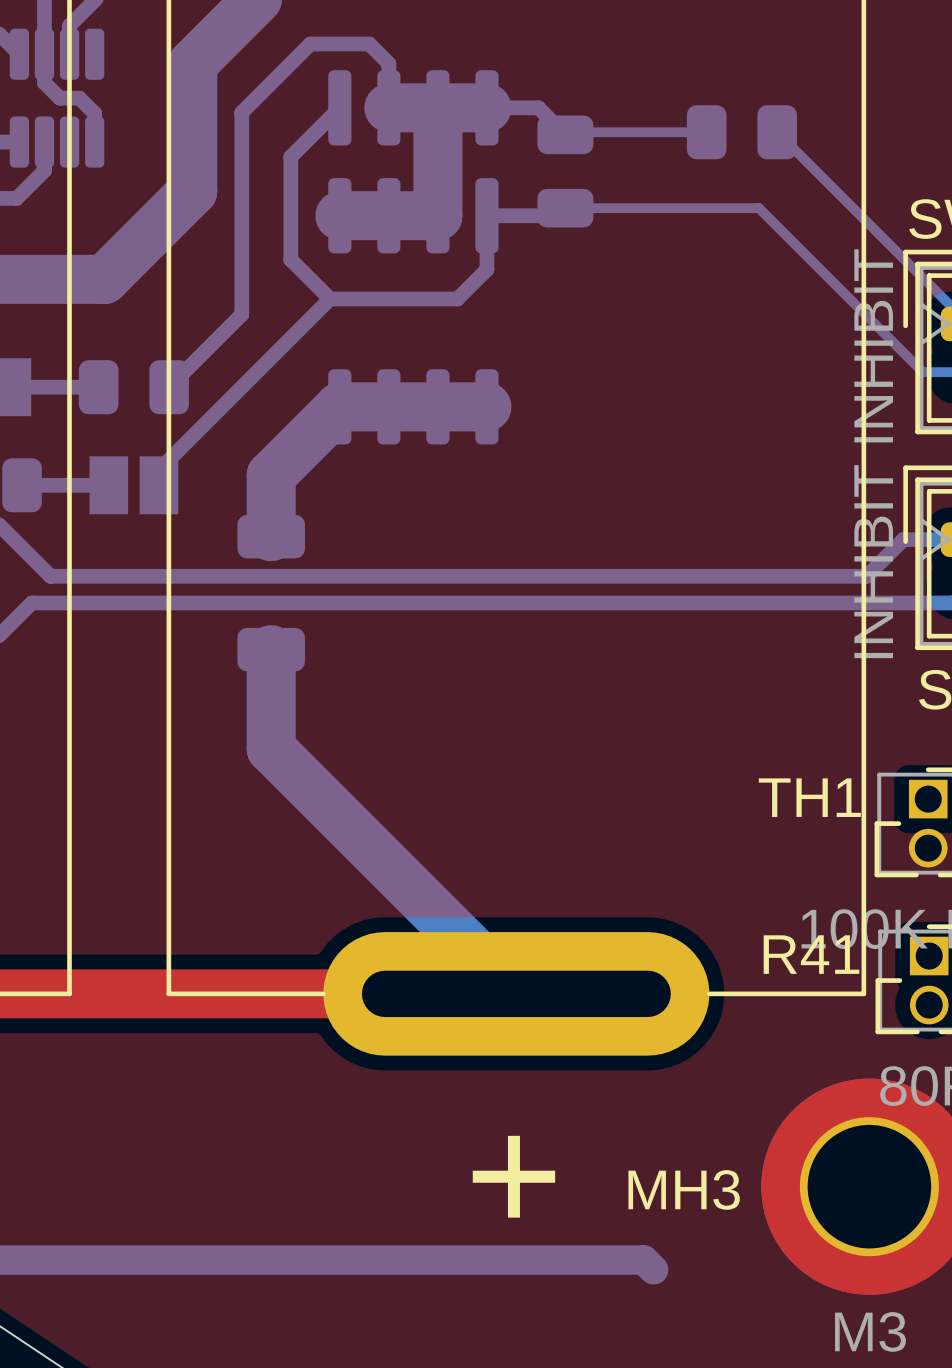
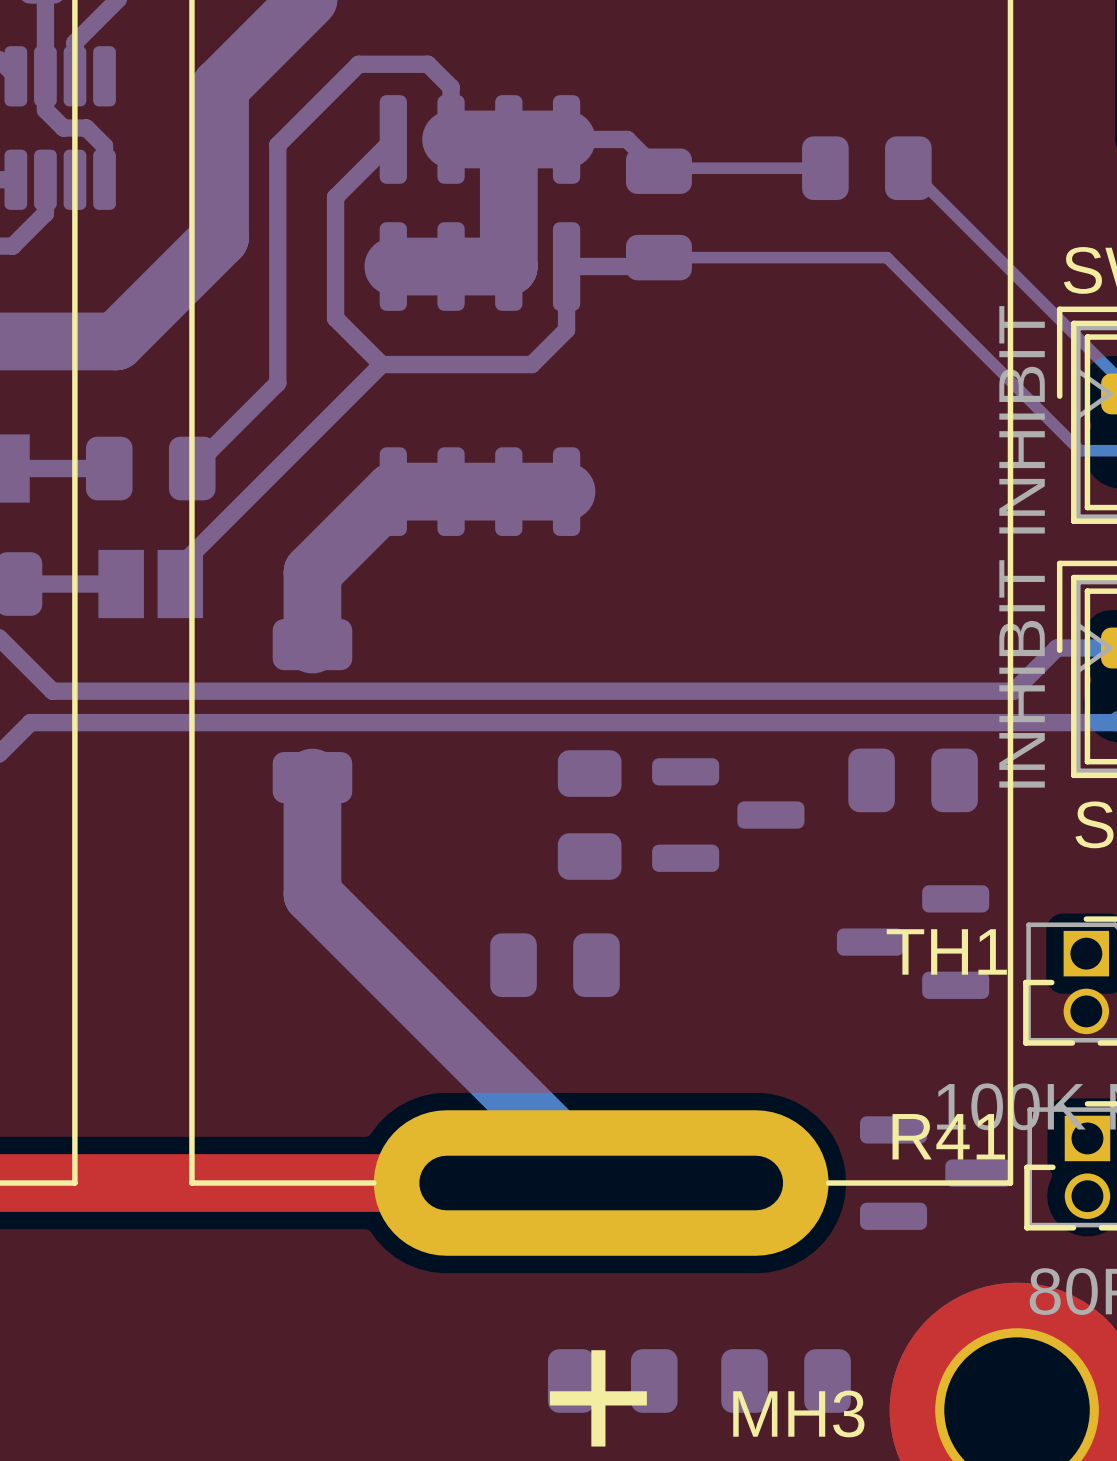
part: none -> (913, 780)
part: none -> (589, 815)
part: none -> (728, 815)
part: none -> (913, 942)
part: none -> (555, 965)
part: none -> (936, 1173)
part: none -> (612, 1381)
part: none -> (786, 1381)

